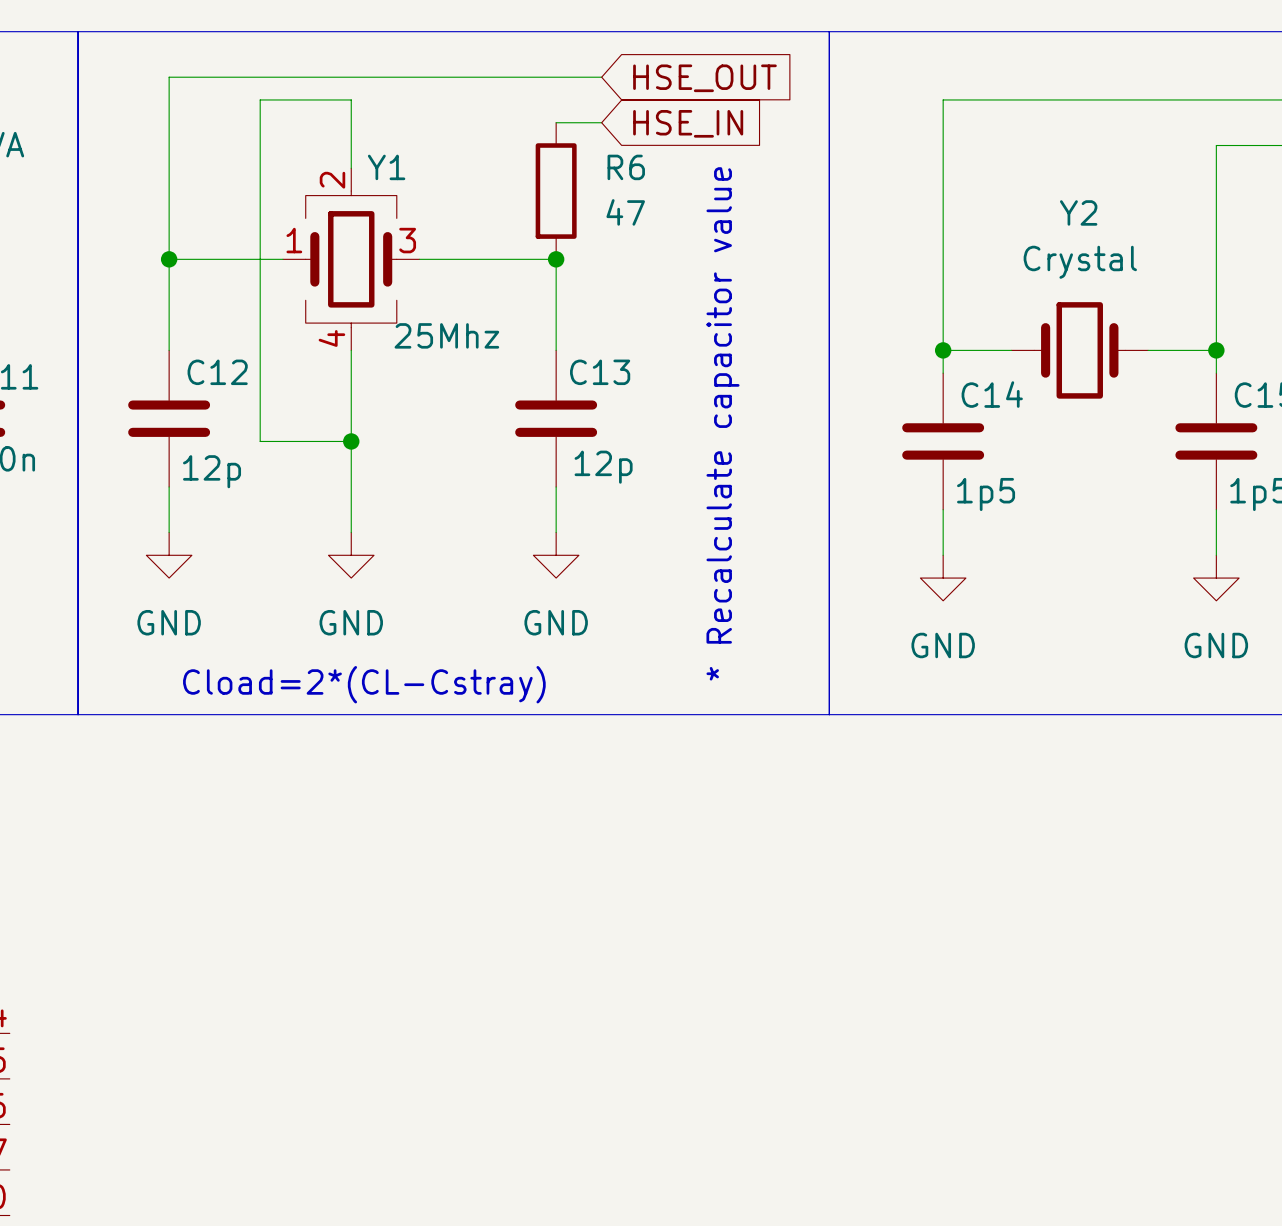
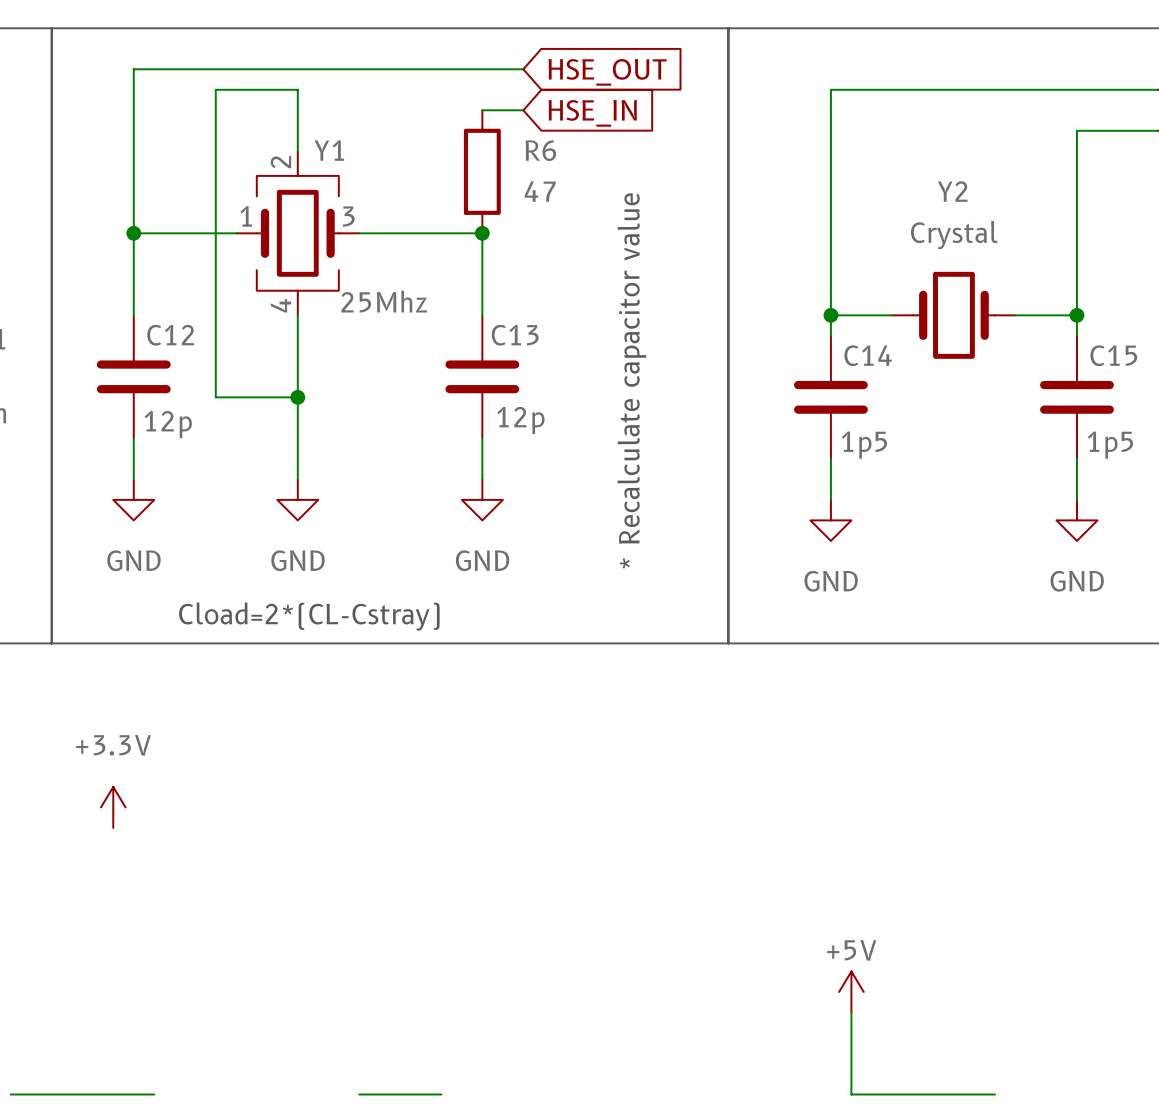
power symbol: none -> +3.3V (113, 807)
power symbol: none -> +5V (851, 991)
wire: none -> (851, 1012) (851, 1094) (994, 1094)
wire: none -> (10, 1094) (154, 1094)
wire: none -> (359, 1094) (441, 1094)

